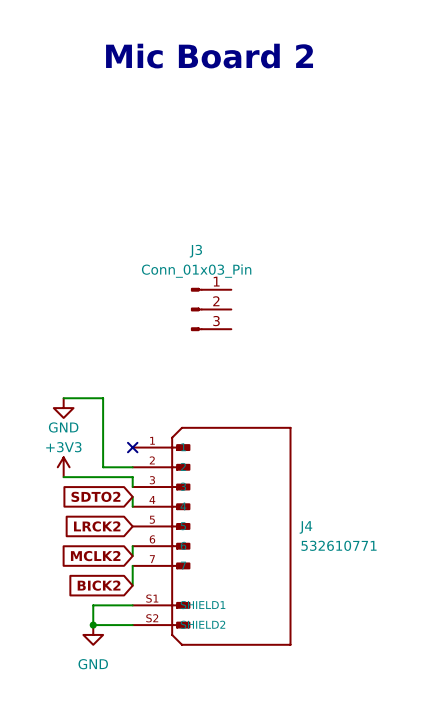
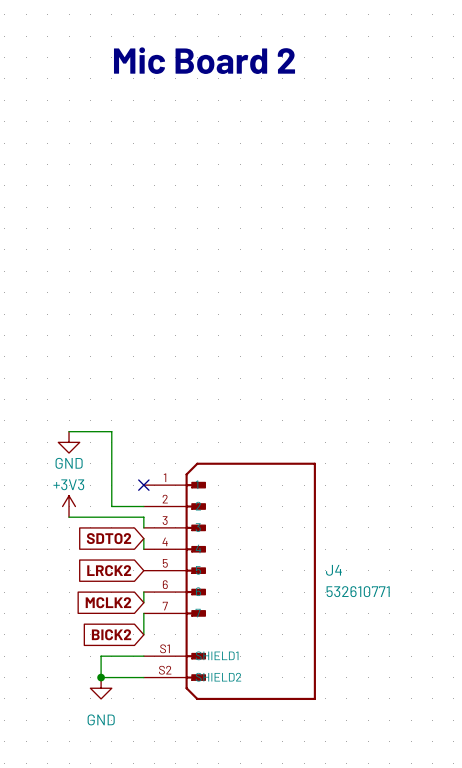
J3: Conn_01x03_Pin (211, 309) -> none

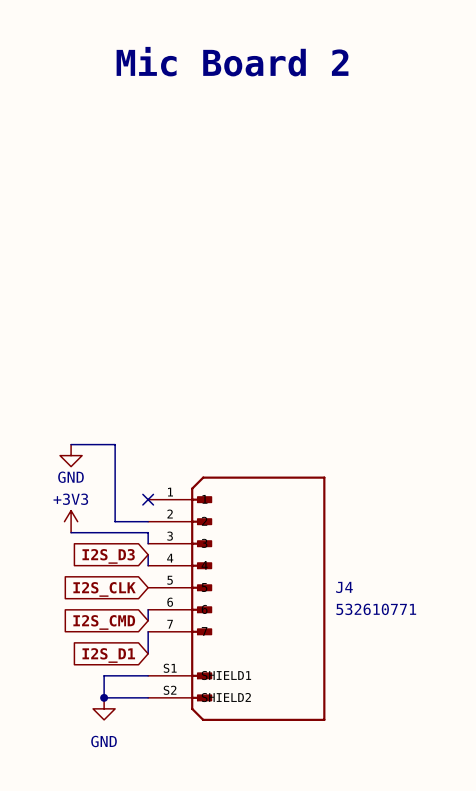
global label: SDTO2 (109, 538) -> I2S_D3 (108, 556)
global label: LRCK2 (109, 570) -> I2S_CLK (104, 589)
global label: MCLK2 (108, 602) -> I2S_CMD (104, 622)
global label: BICK2 (111, 634) -> I2S_D1 (108, 655)

